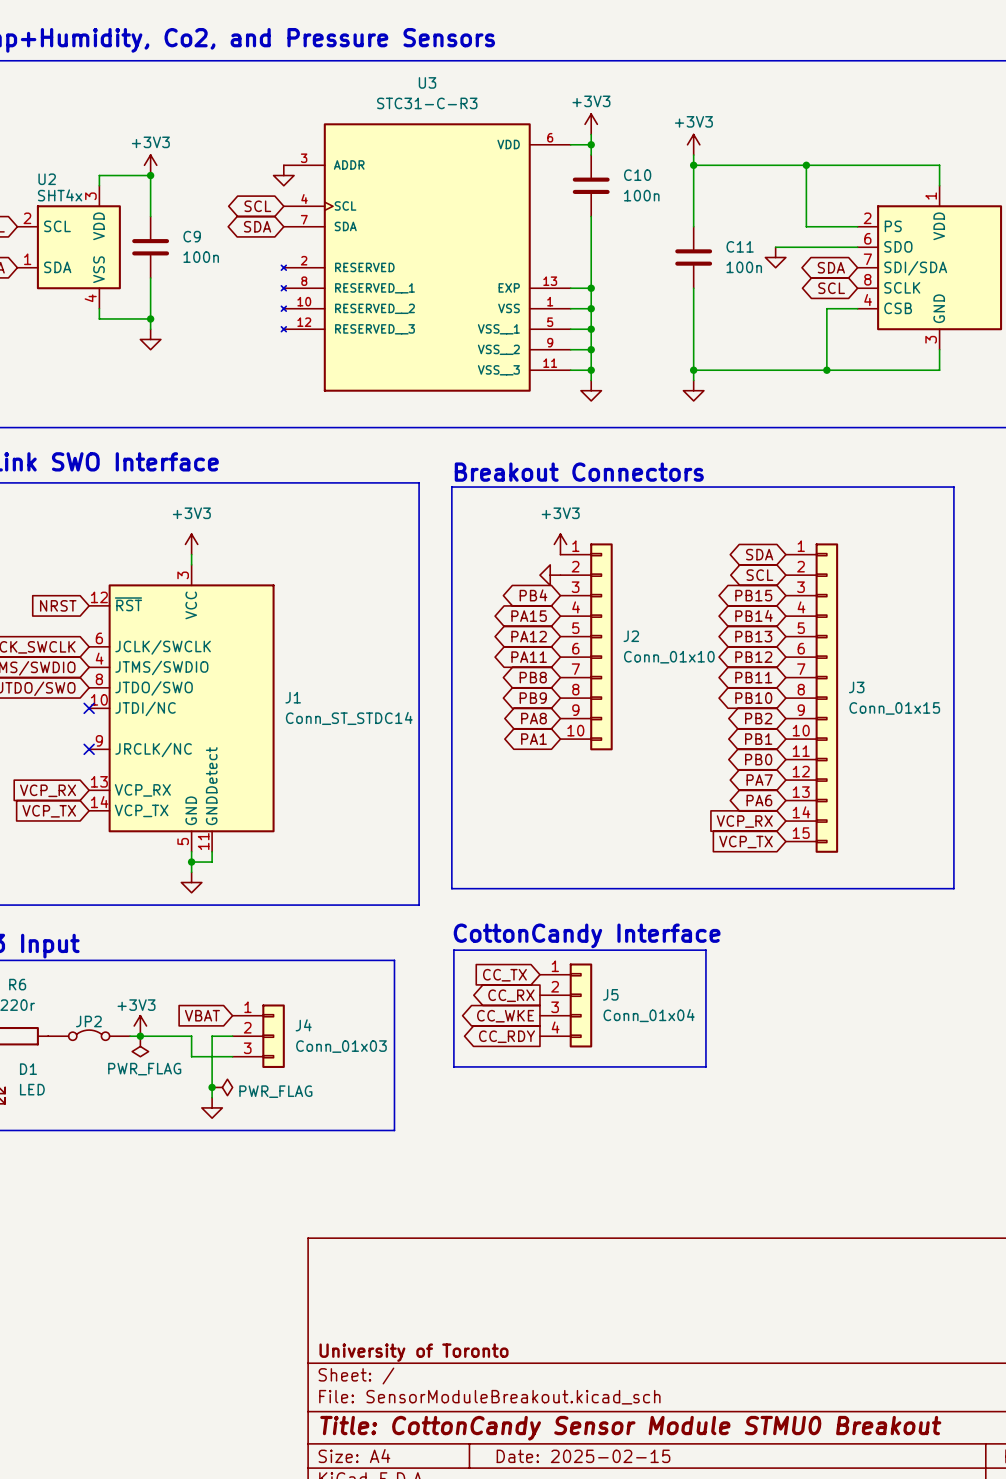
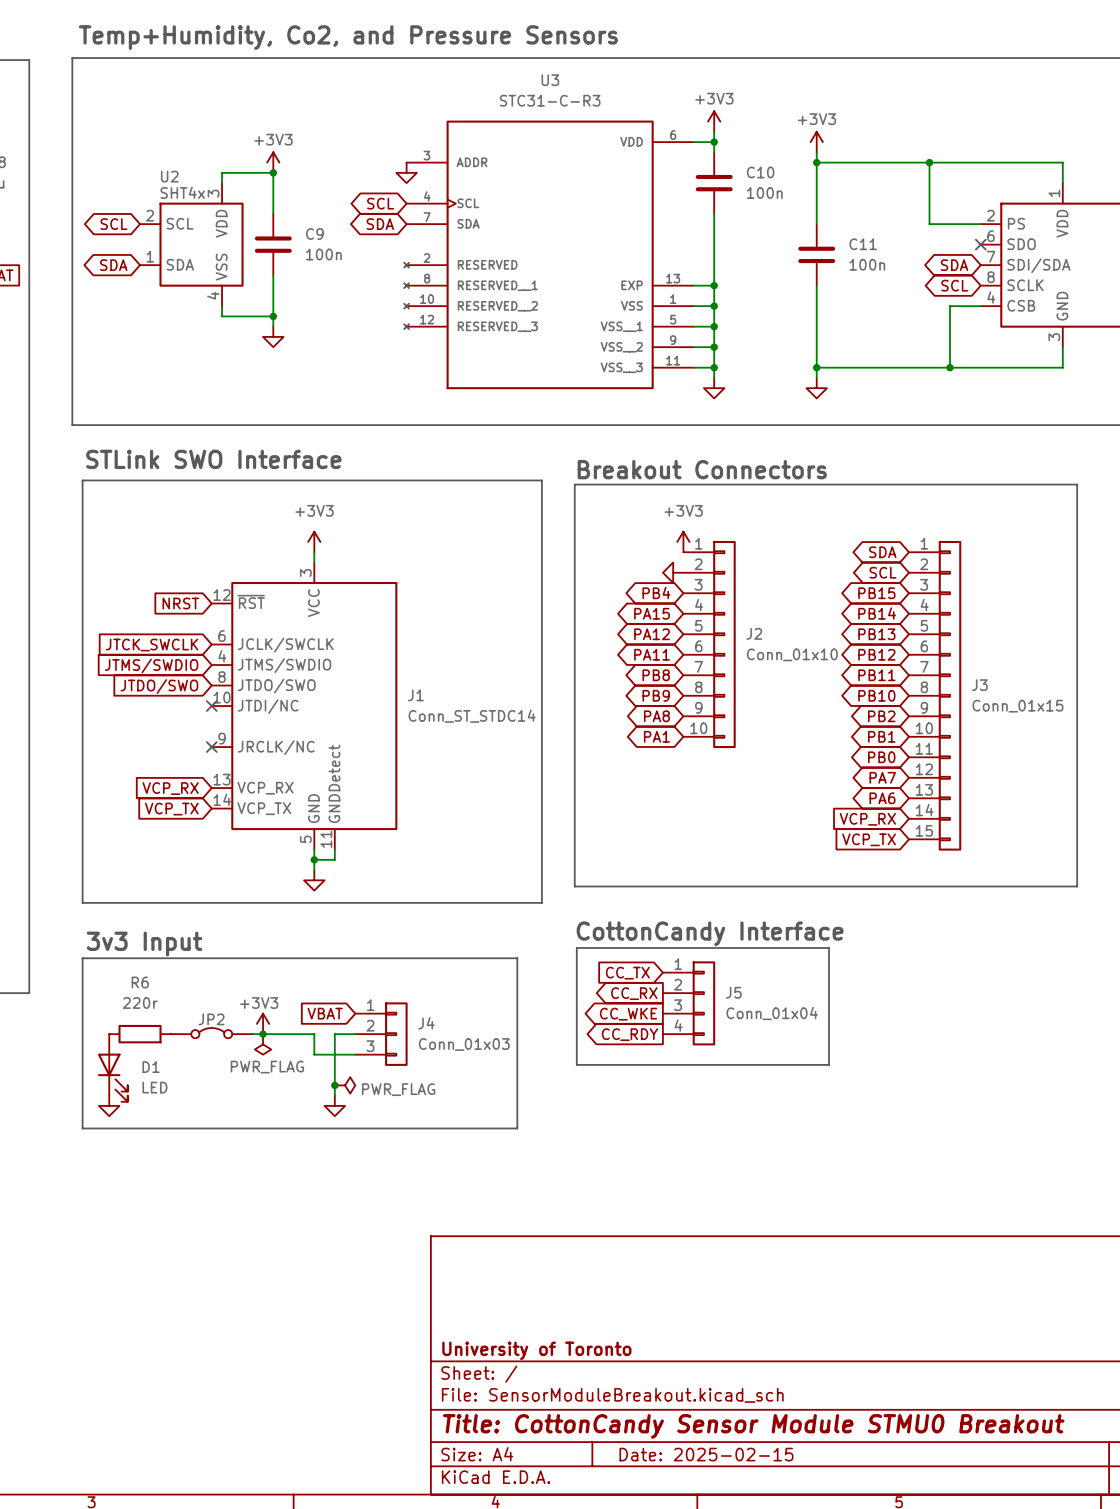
wire: (775, 247) (857, 247) -> none
no-connect mark: none -> (980, 244)
power symbol: (775, 257) -> none

